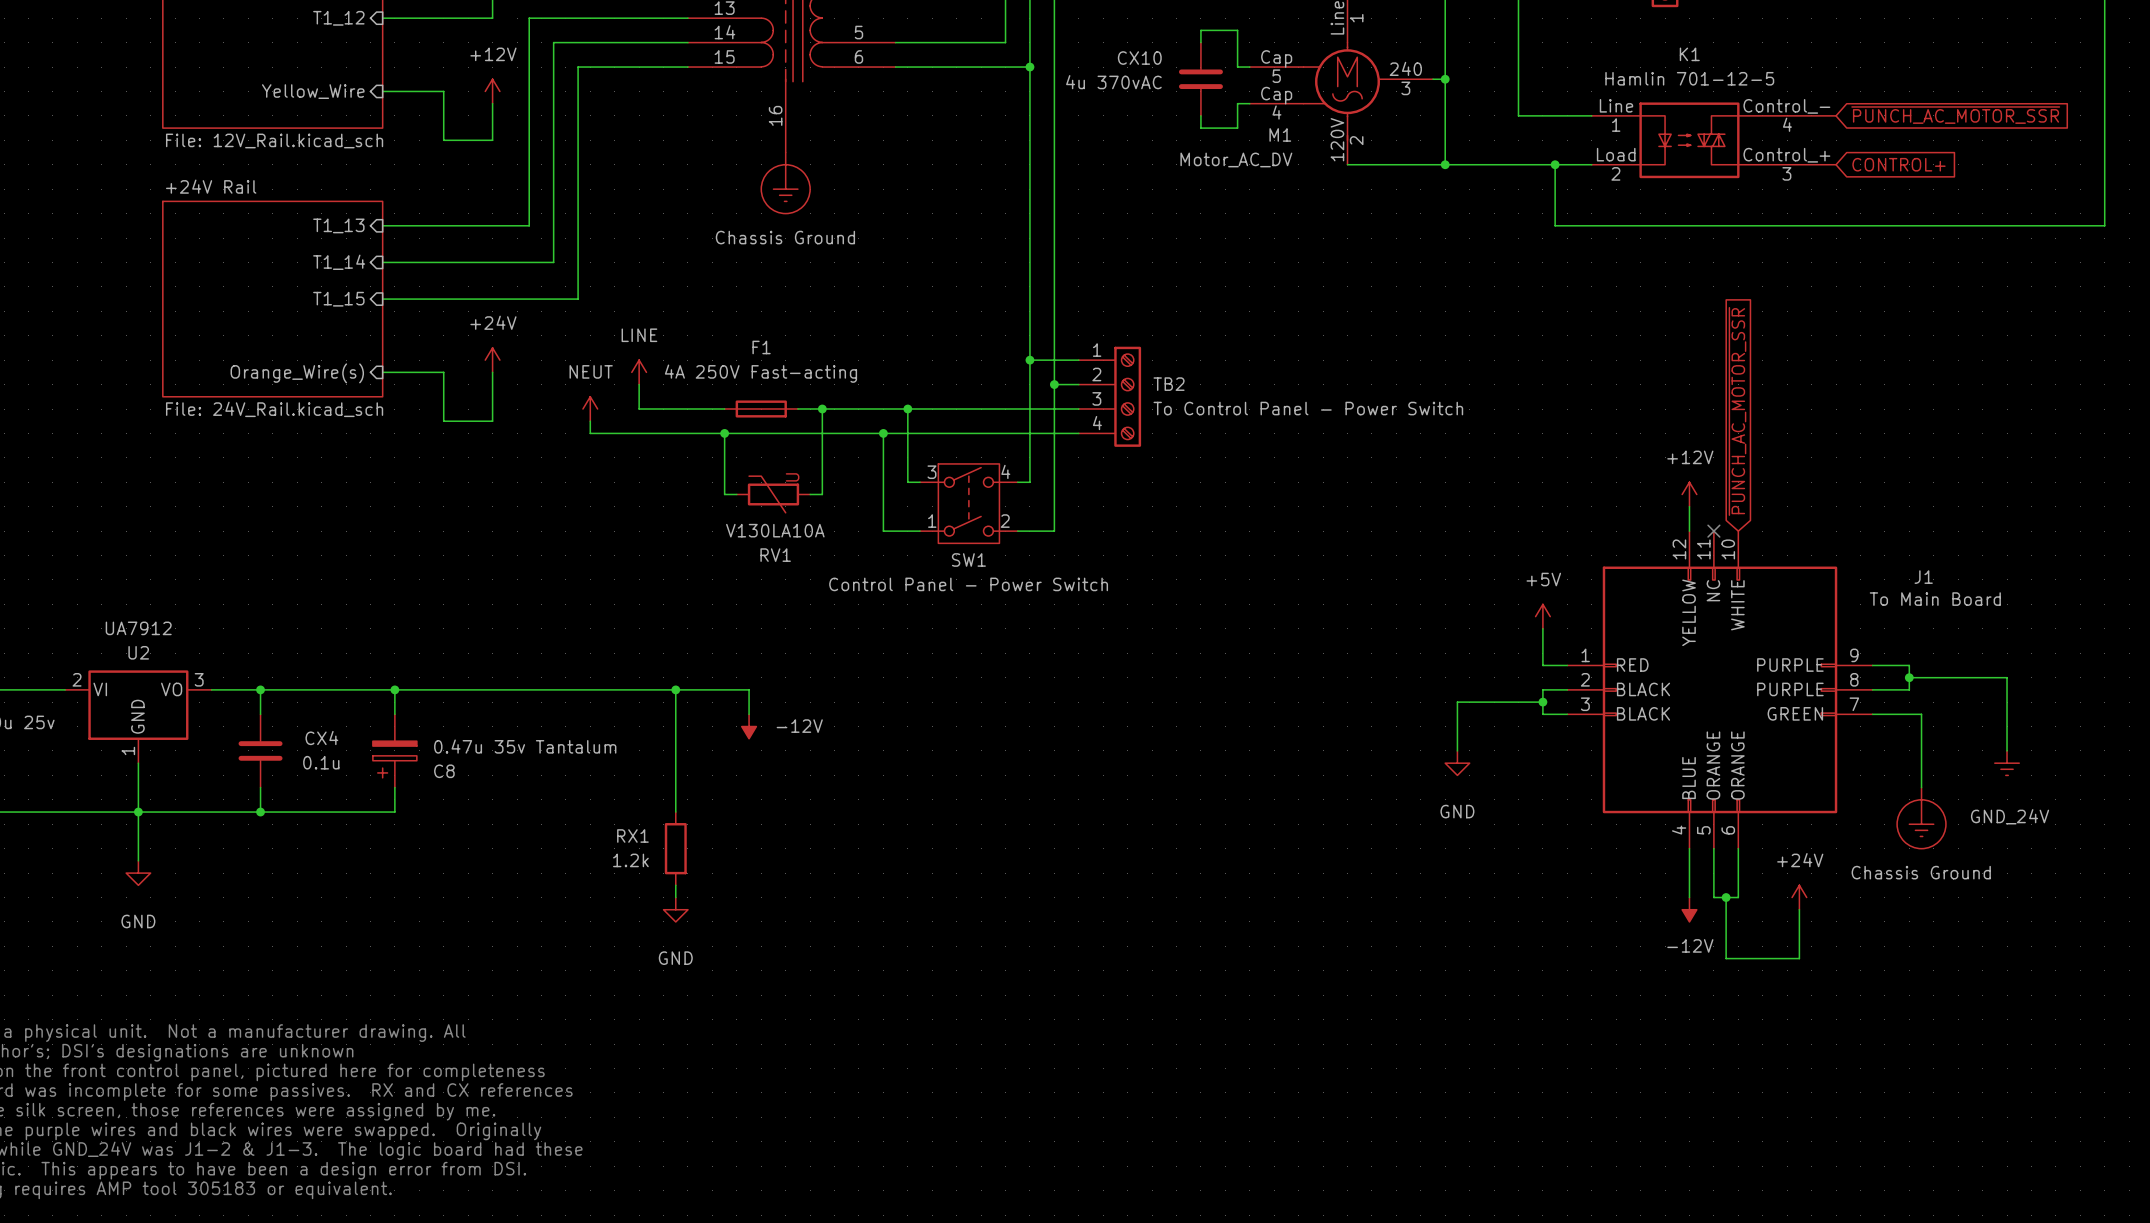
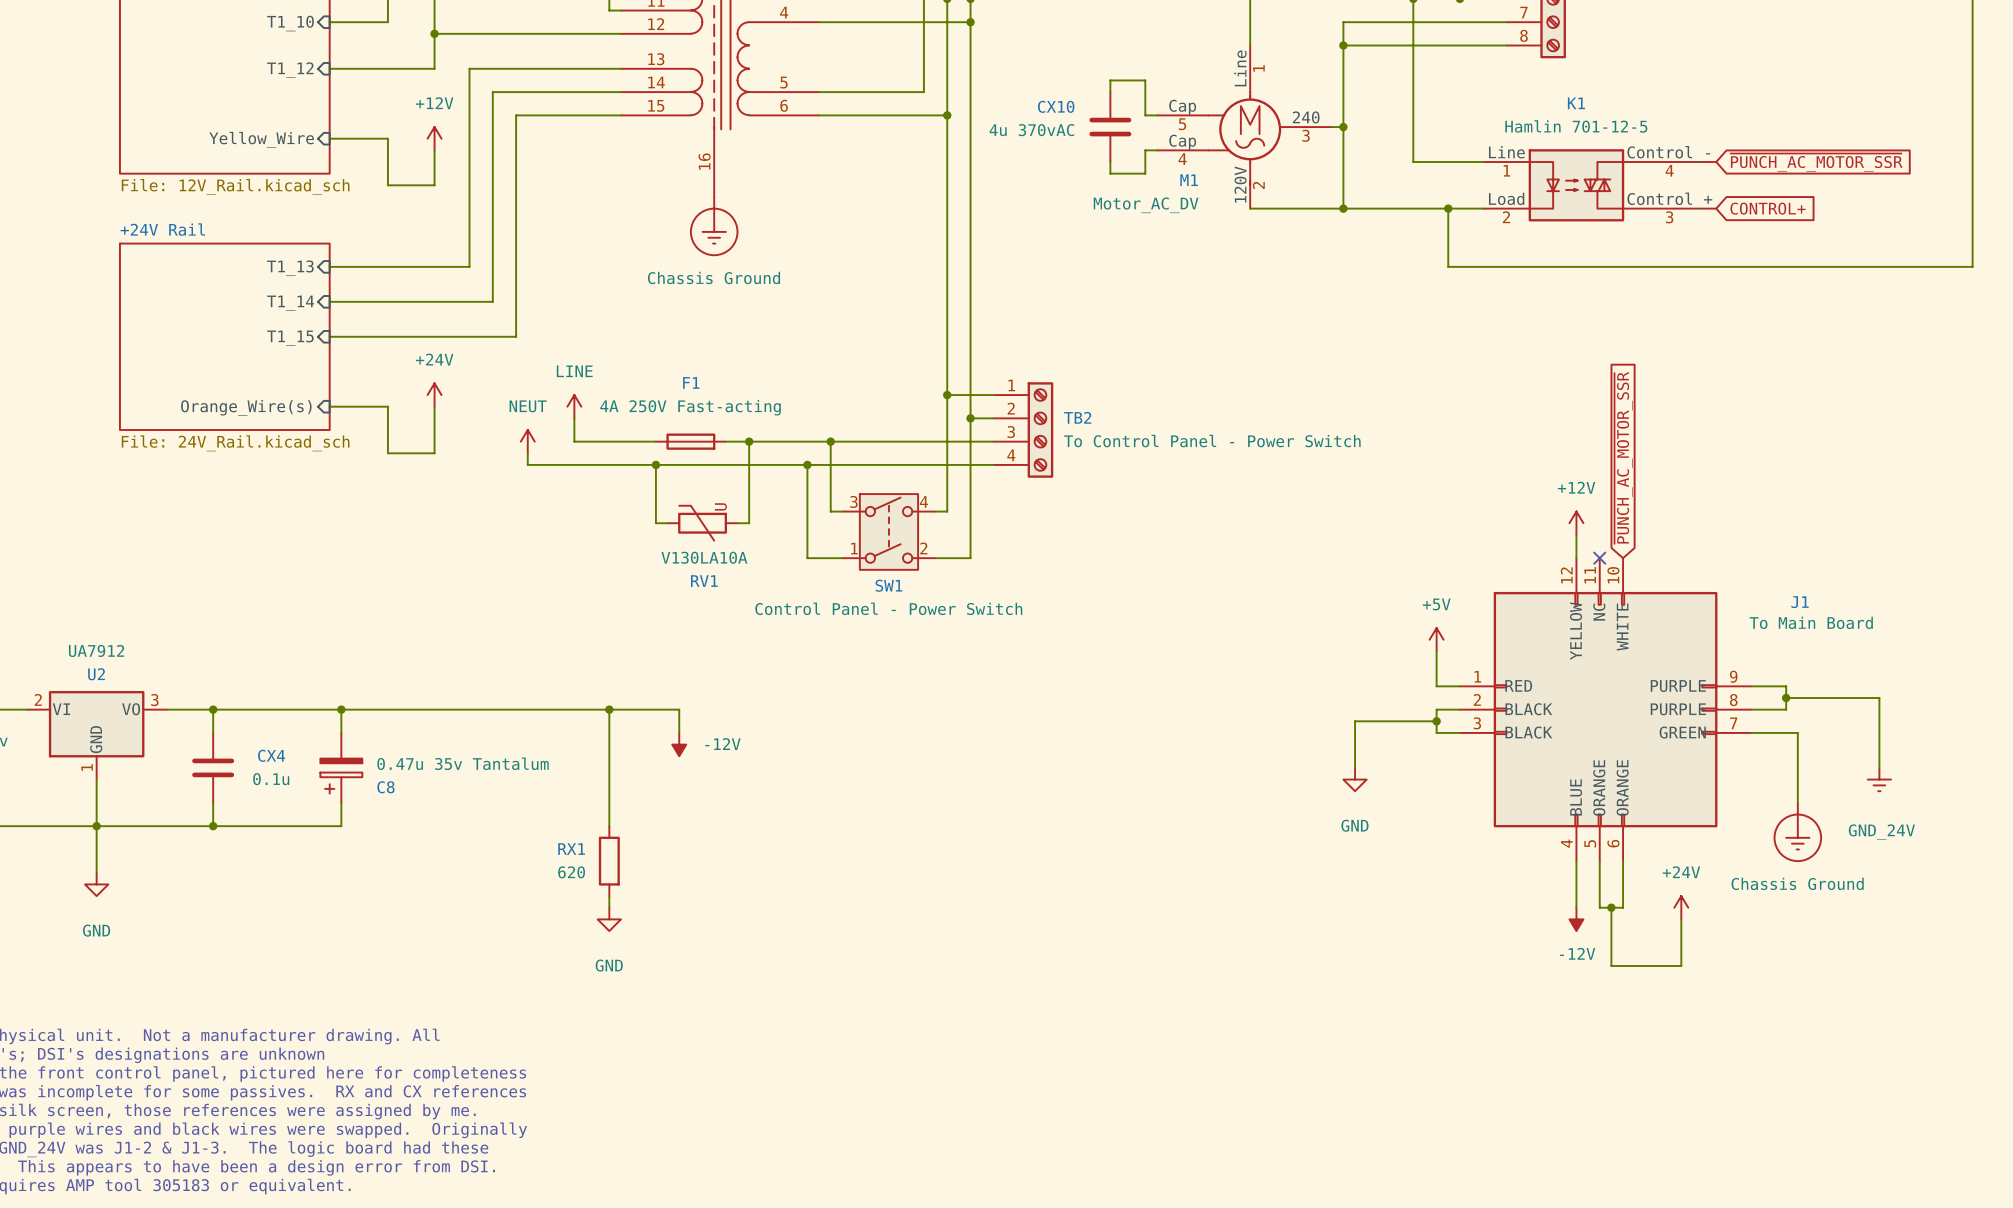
RX1 value: 1.2k (630, 860) -> 620 (571, 872)

